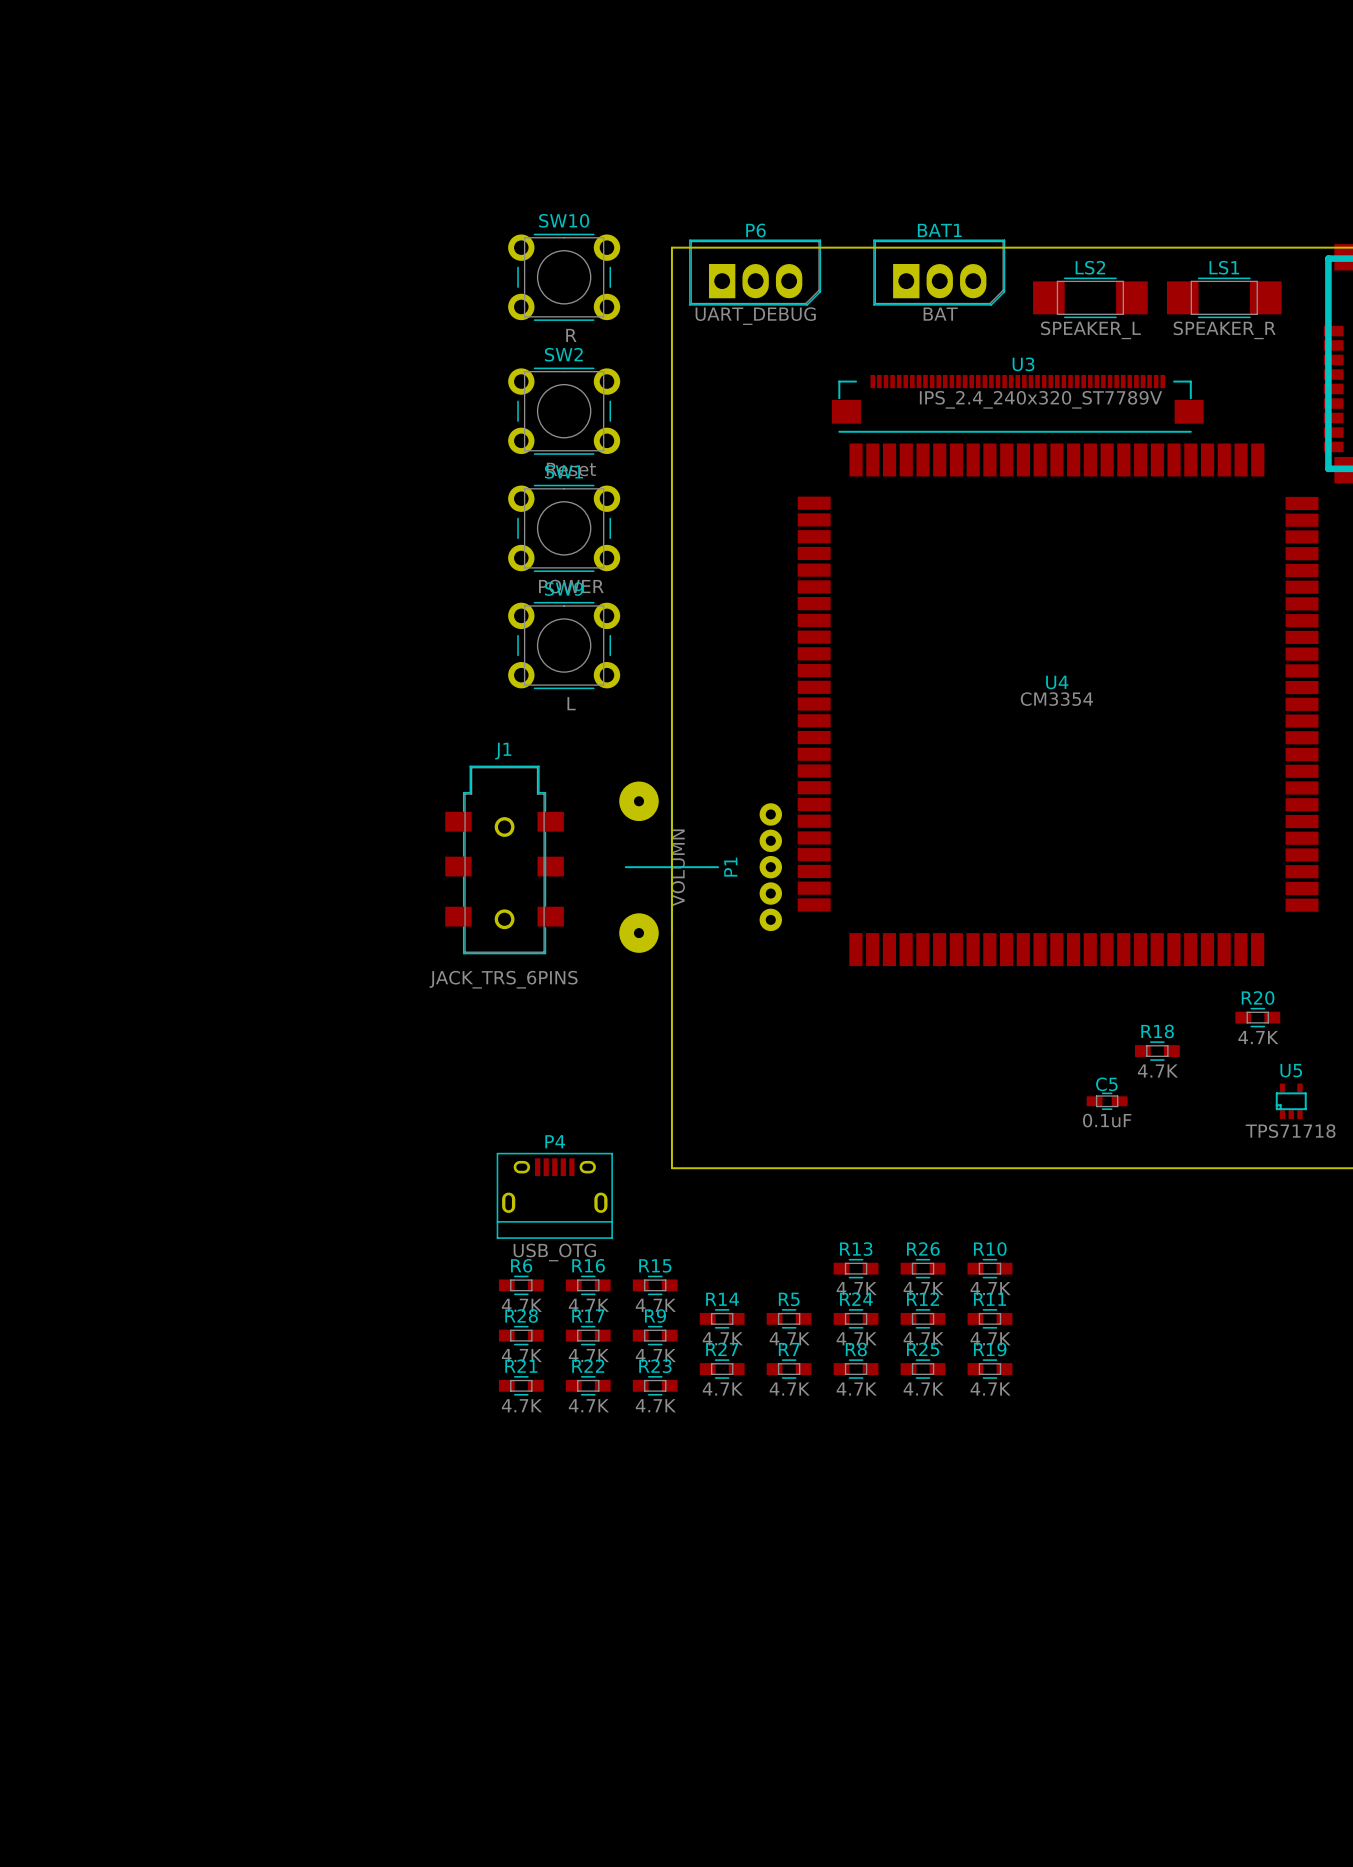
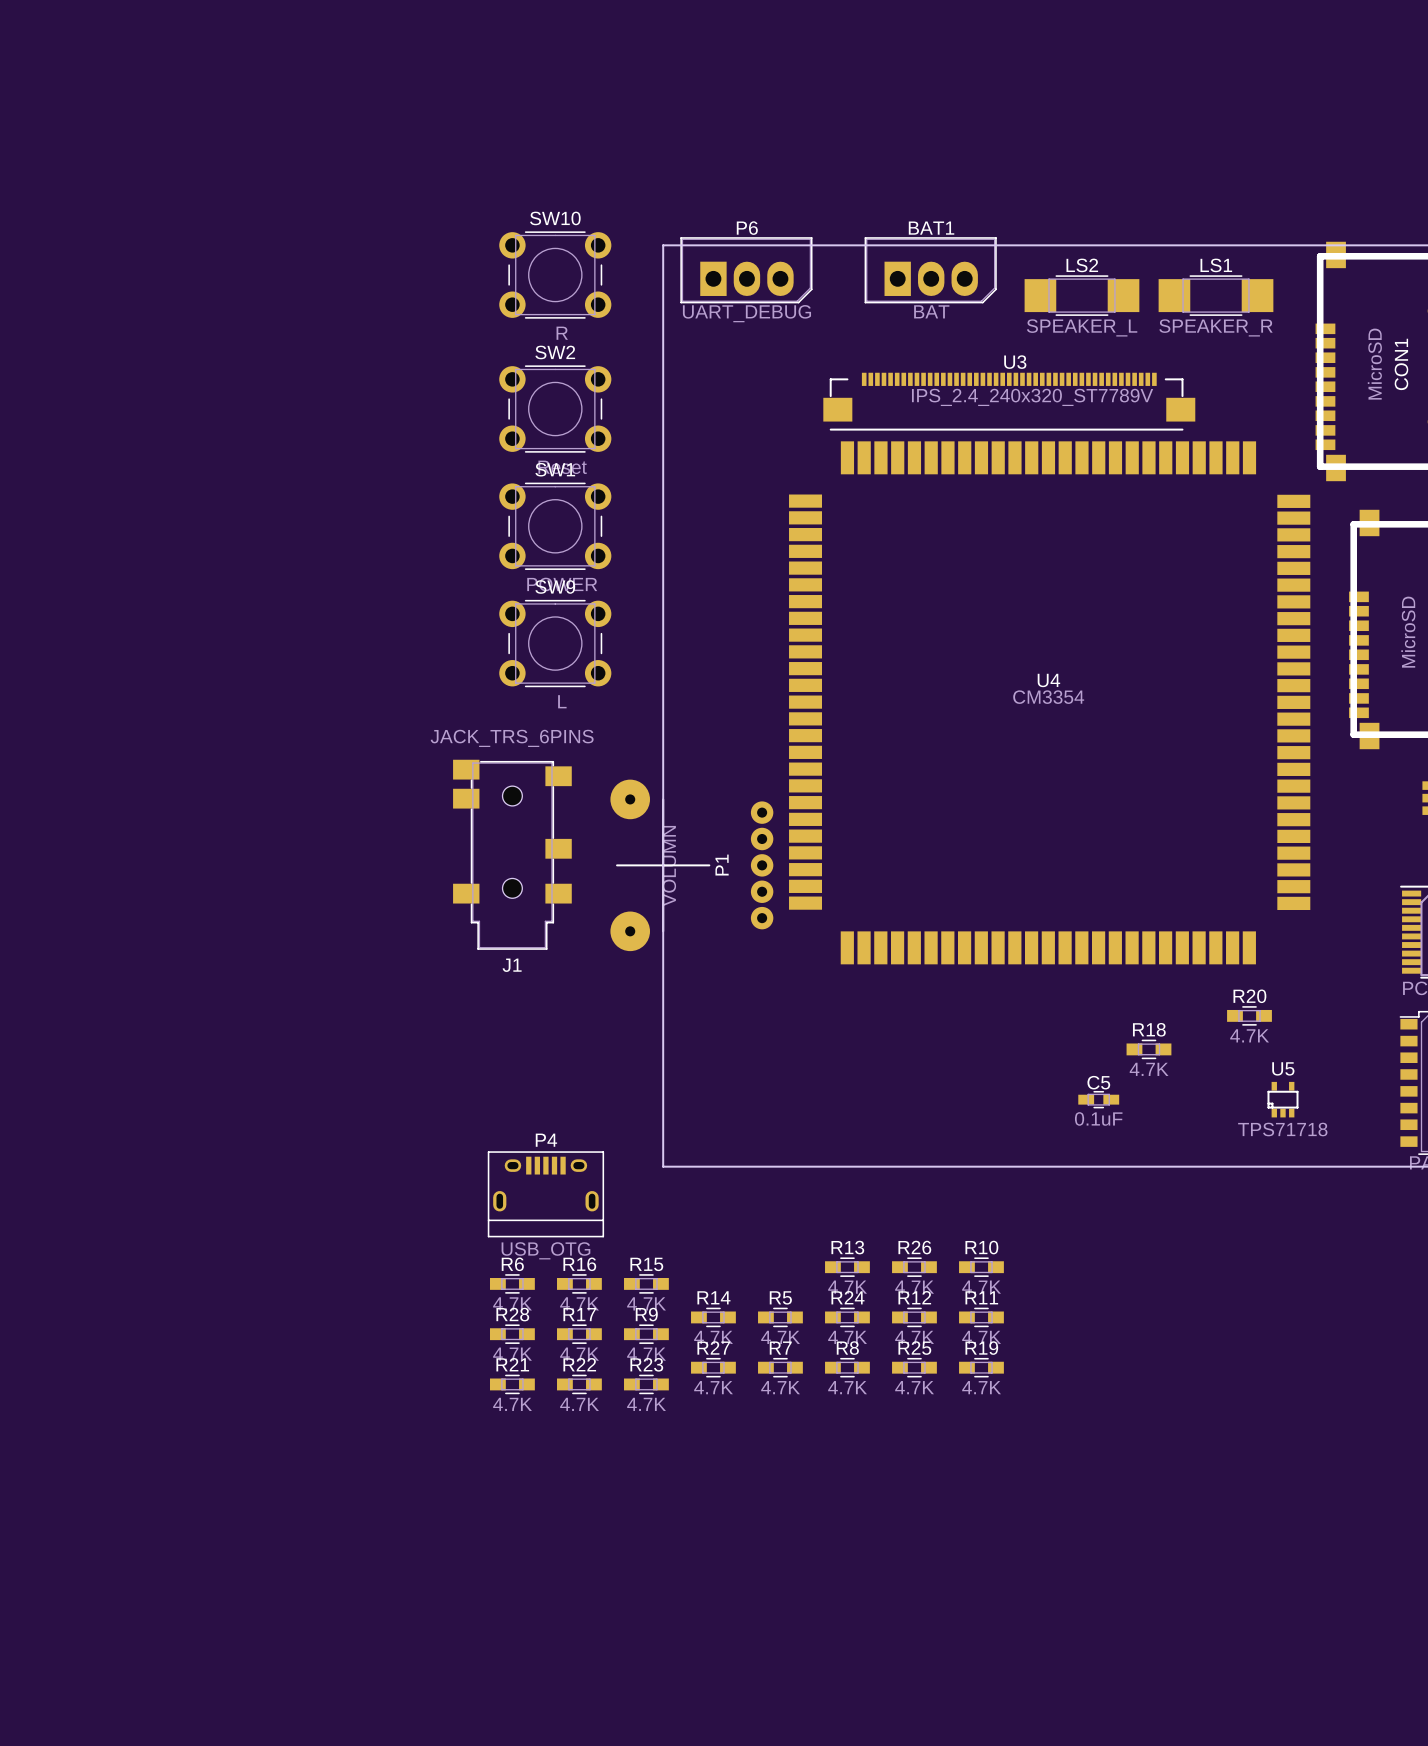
J1 name position: J1 (503, 751) -> J1 (512, 965)
J1 footprint: [445, 765, 564, 955] -> [453, 759, 572, 950]
J1 value position: JACK_TRS_6PINS (503, 979) -> JACK_TRS_6PINS (512, 738)

